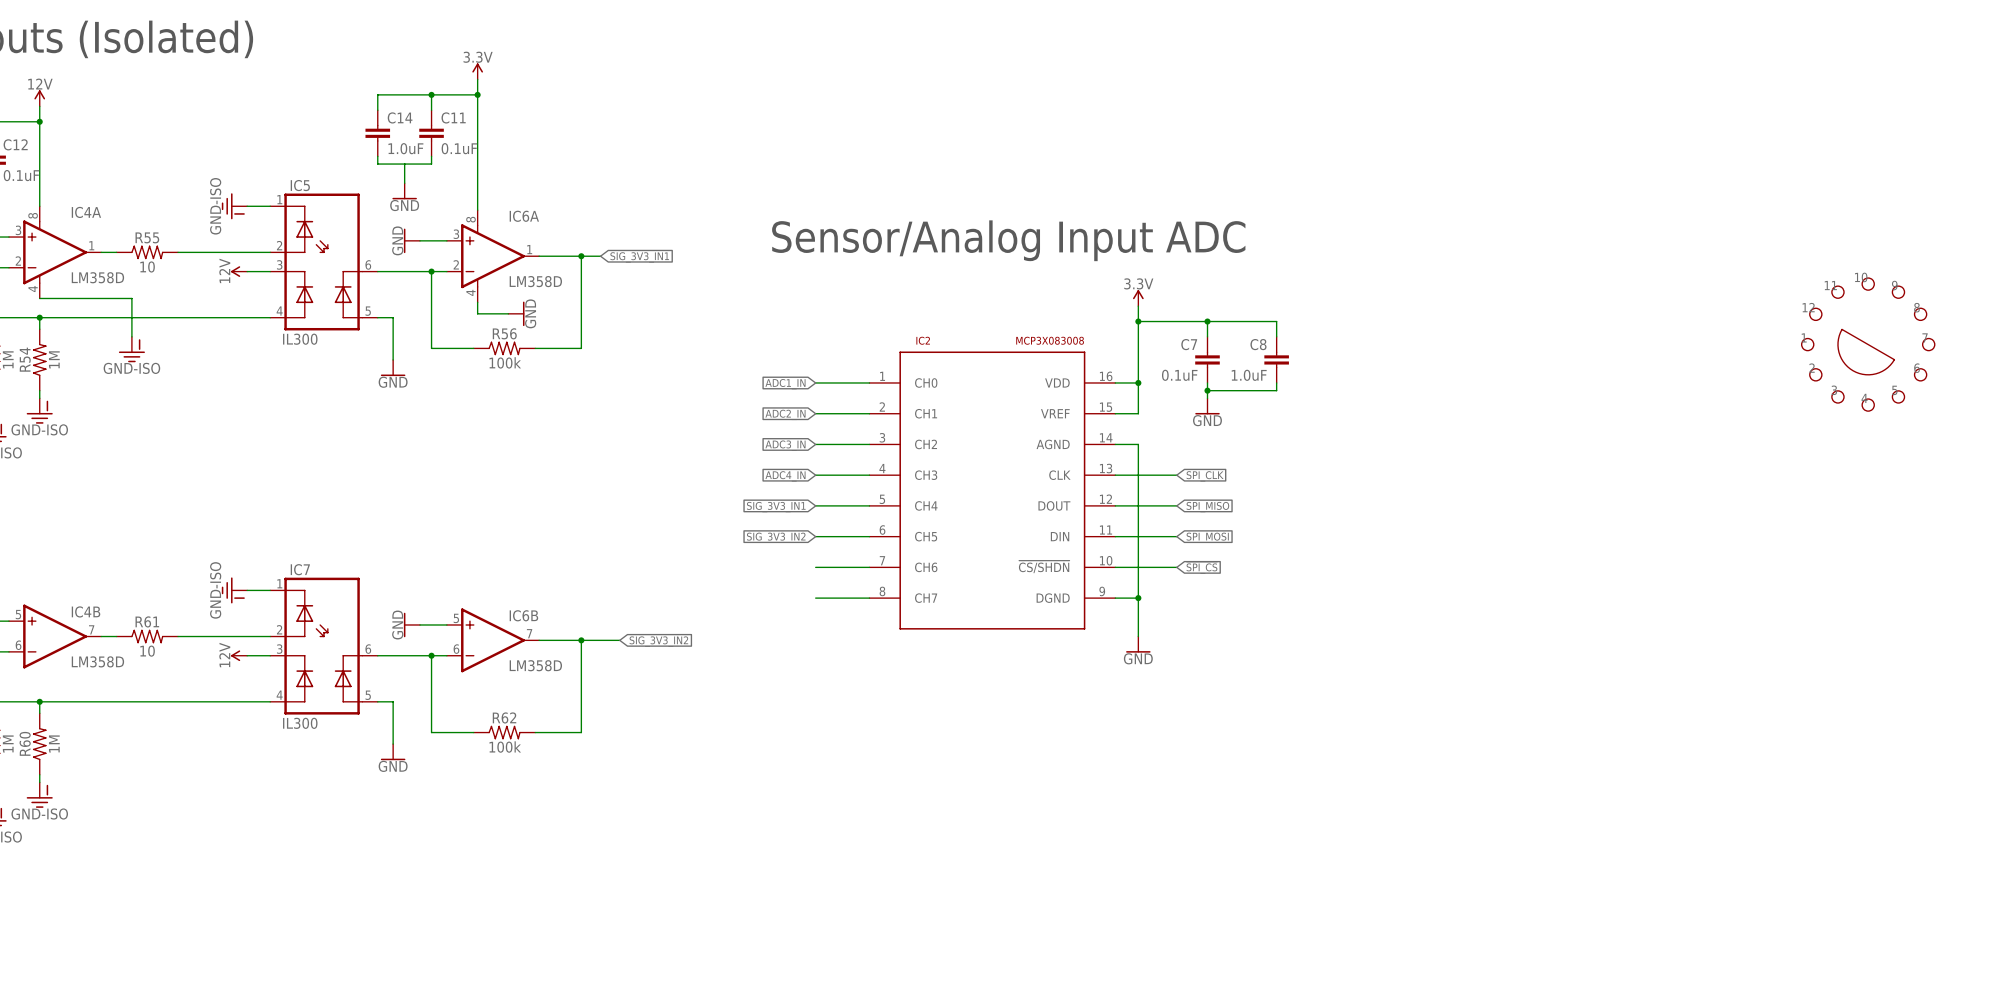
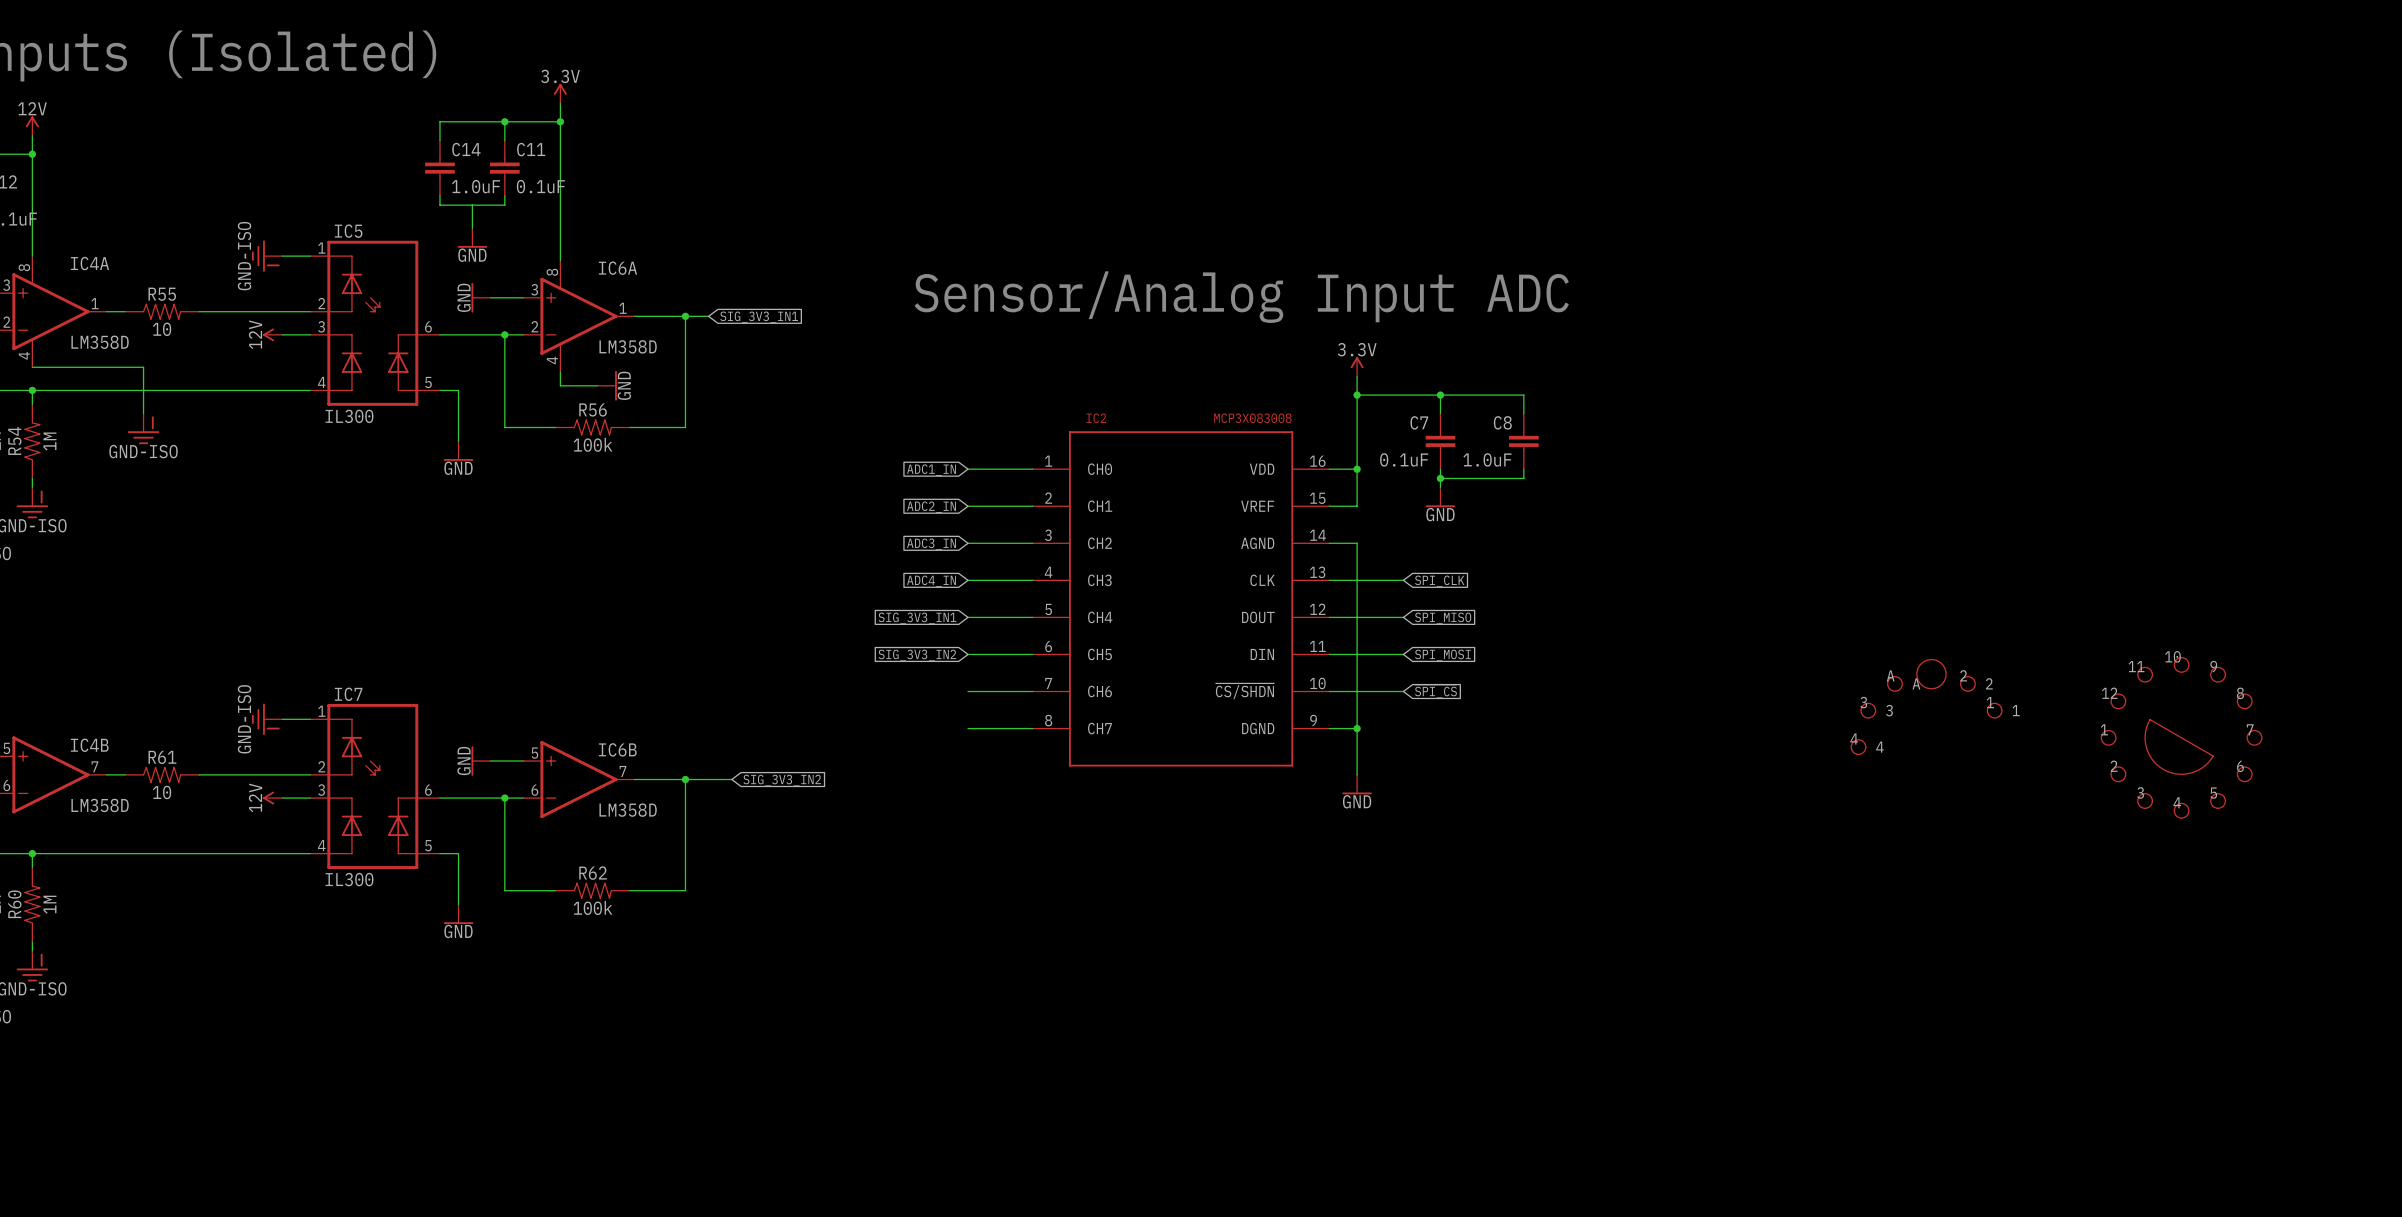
part: (1868, 344) -> none
part: none -> (1926, 706)
part: none -> (2181, 737)

